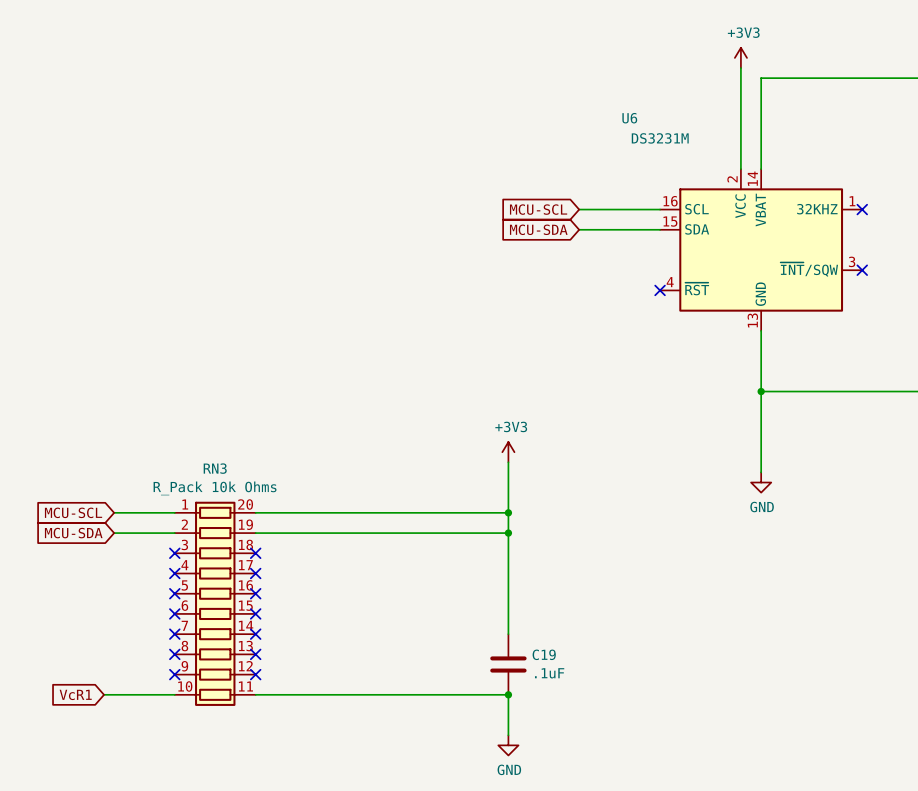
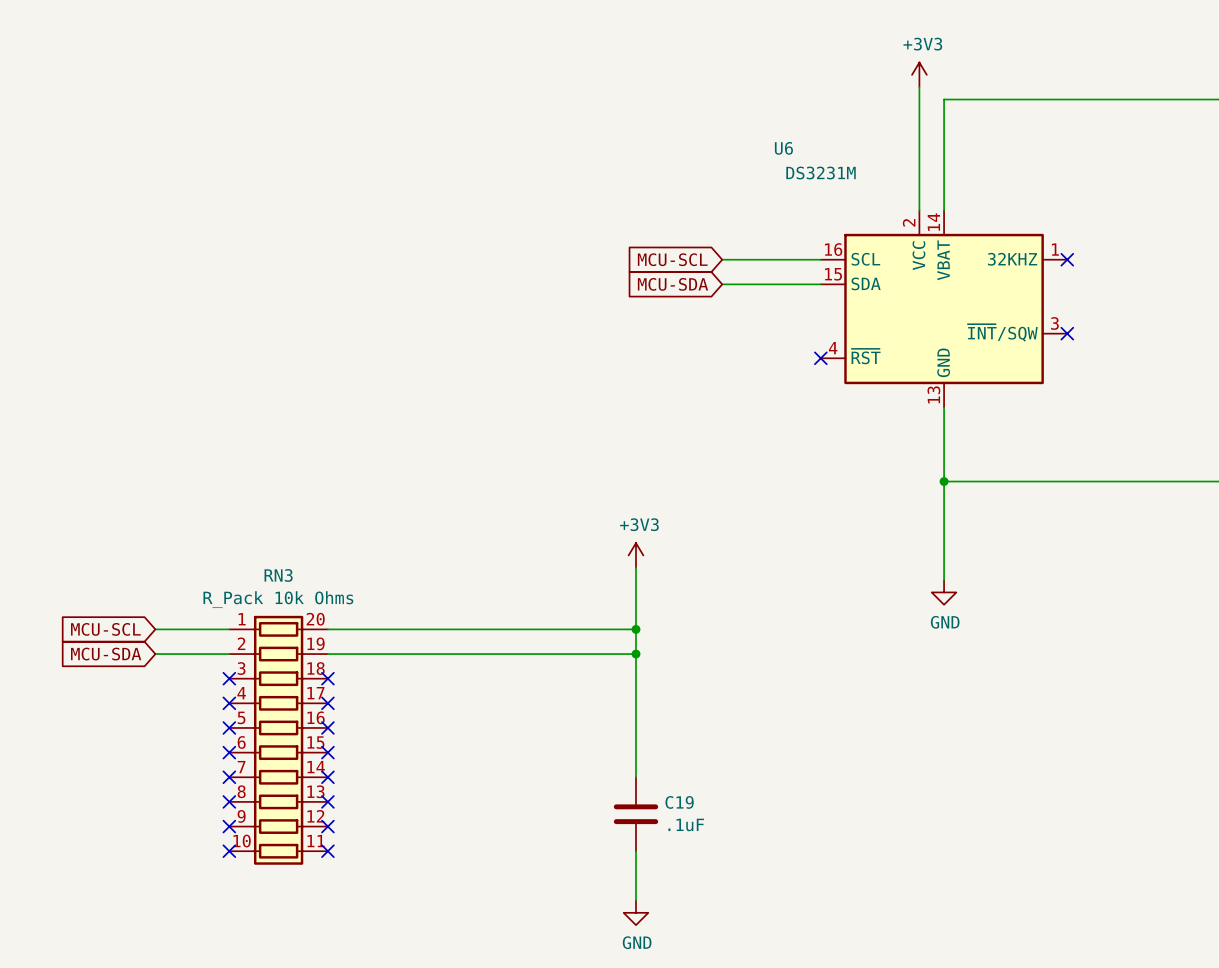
global label: VcR1 (75, 694) -> none
wire: (104, 694) (174, 694) -> none
no-connect mark: none -> (229, 851)
wire: (255, 694) (508, 694) -> none
no-connect mark: none -> (327, 851)
junction: (508, 694) -> none

